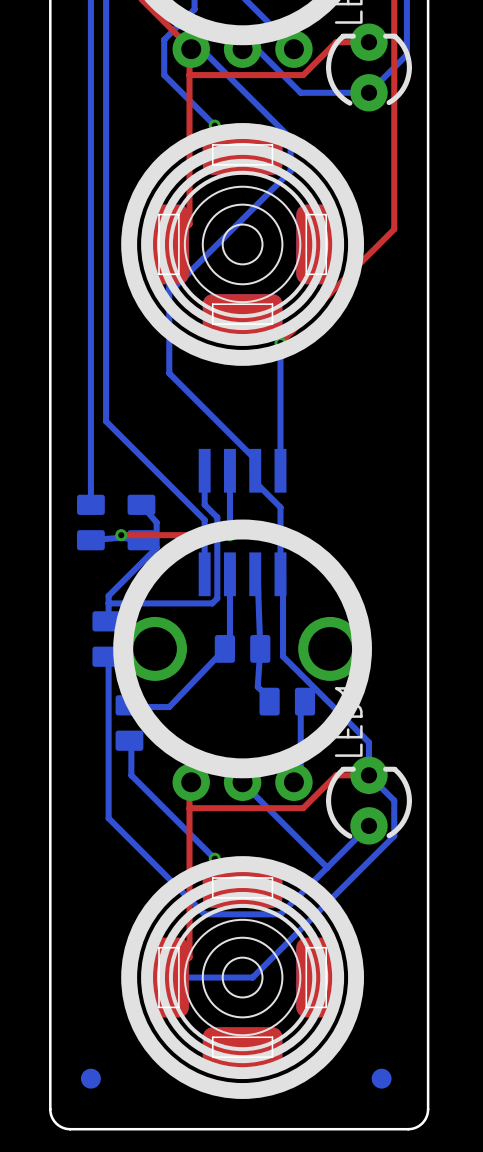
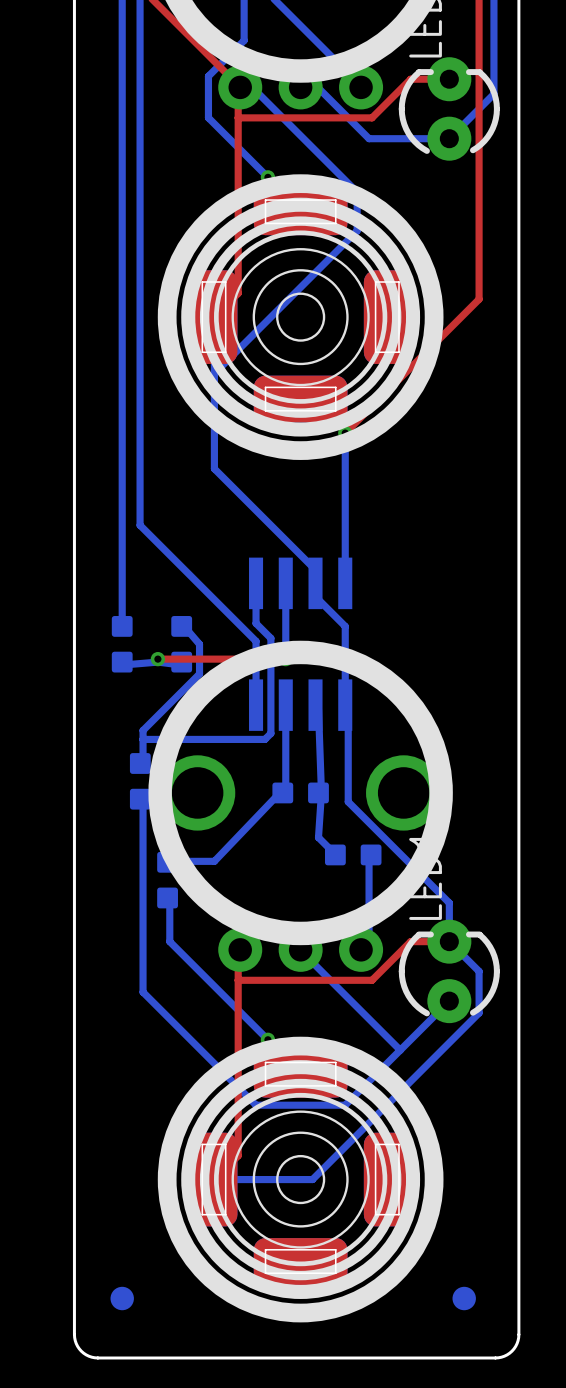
part footprint: [77, 494, 105, 551] -> [111, 616, 133, 673]
part footprint: [127, 494, 156, 551] -> [171, 616, 193, 673]
part footprint: [92, 611, 121, 667] -> [129, 753, 151, 810]
part footprint: [214, 635, 271, 663] -> [272, 782, 329, 804]
part footprint: [259, 687, 316, 716] -> [324, 844, 382, 866]
part footprint: [115, 695, 144, 751] -> [157, 851, 178, 909]

